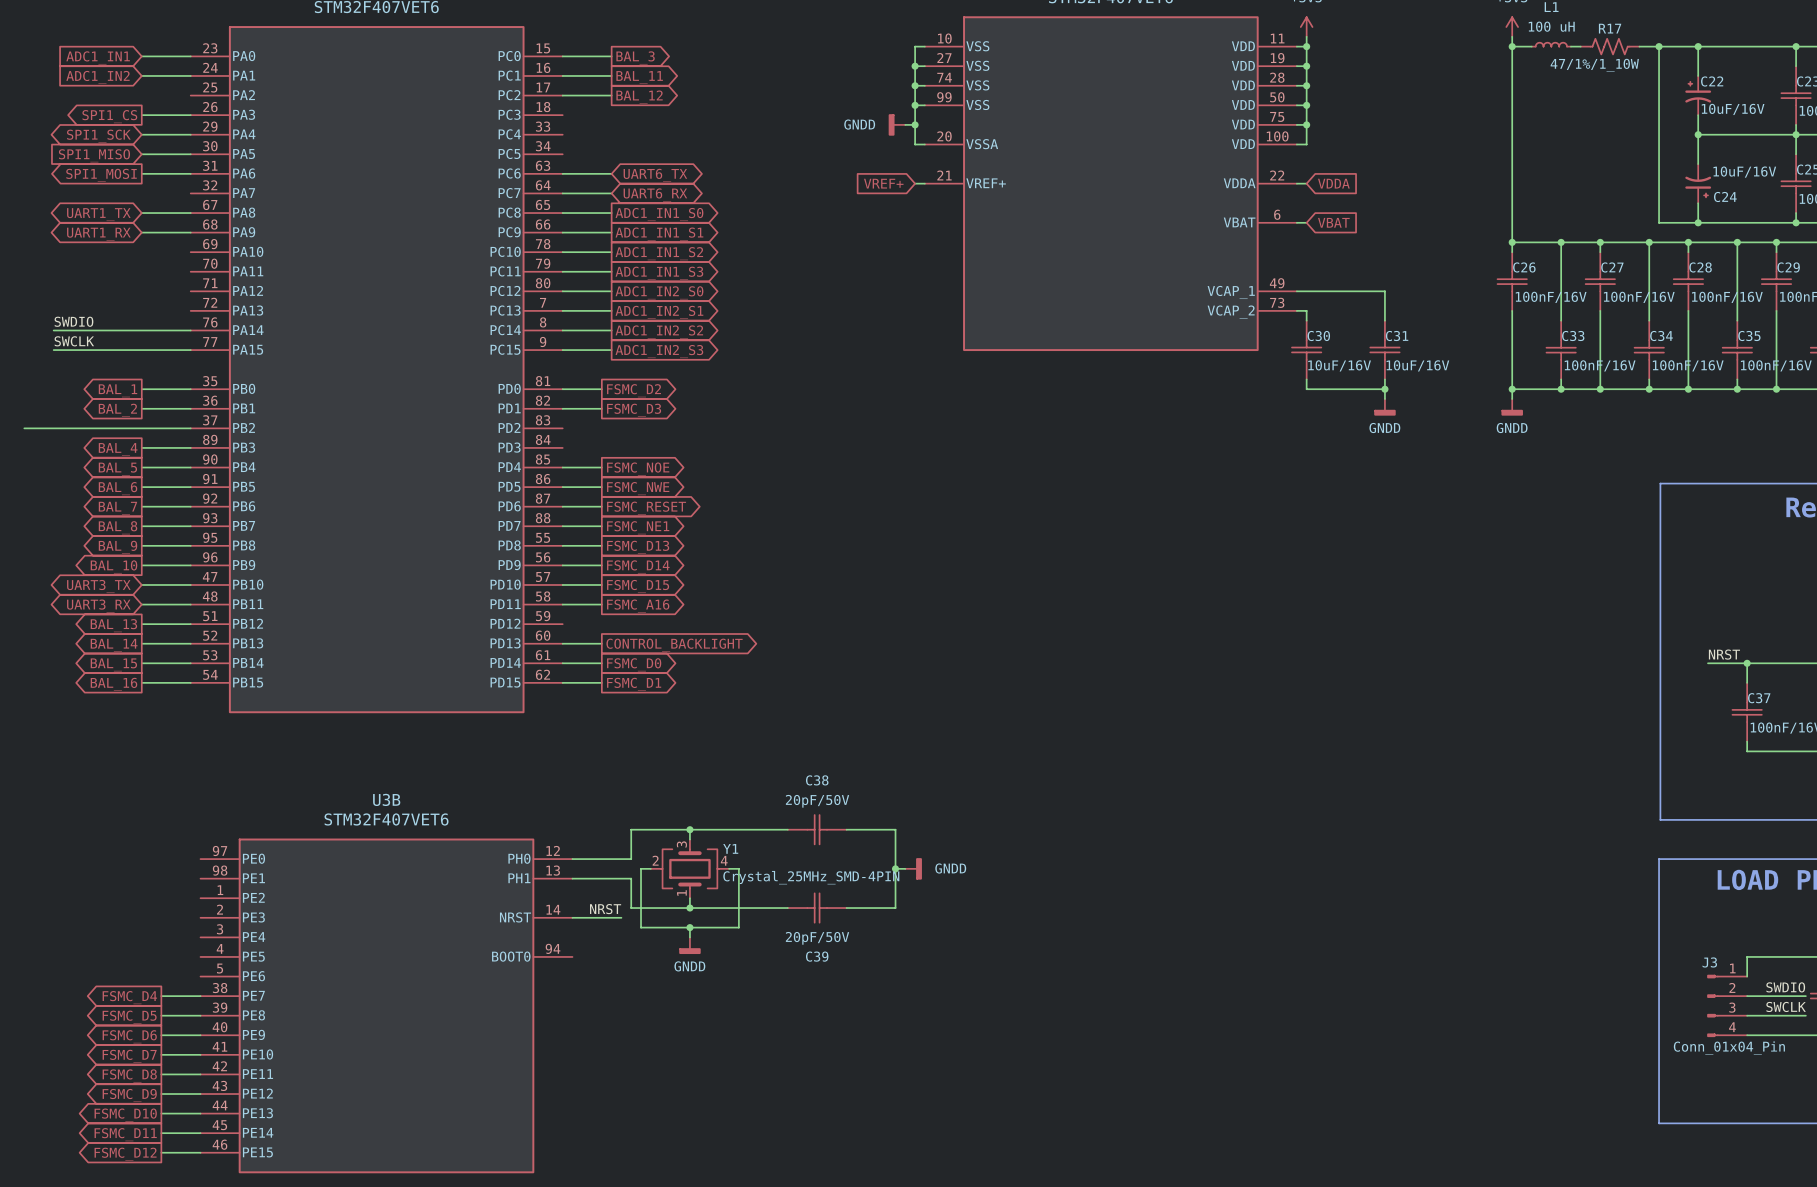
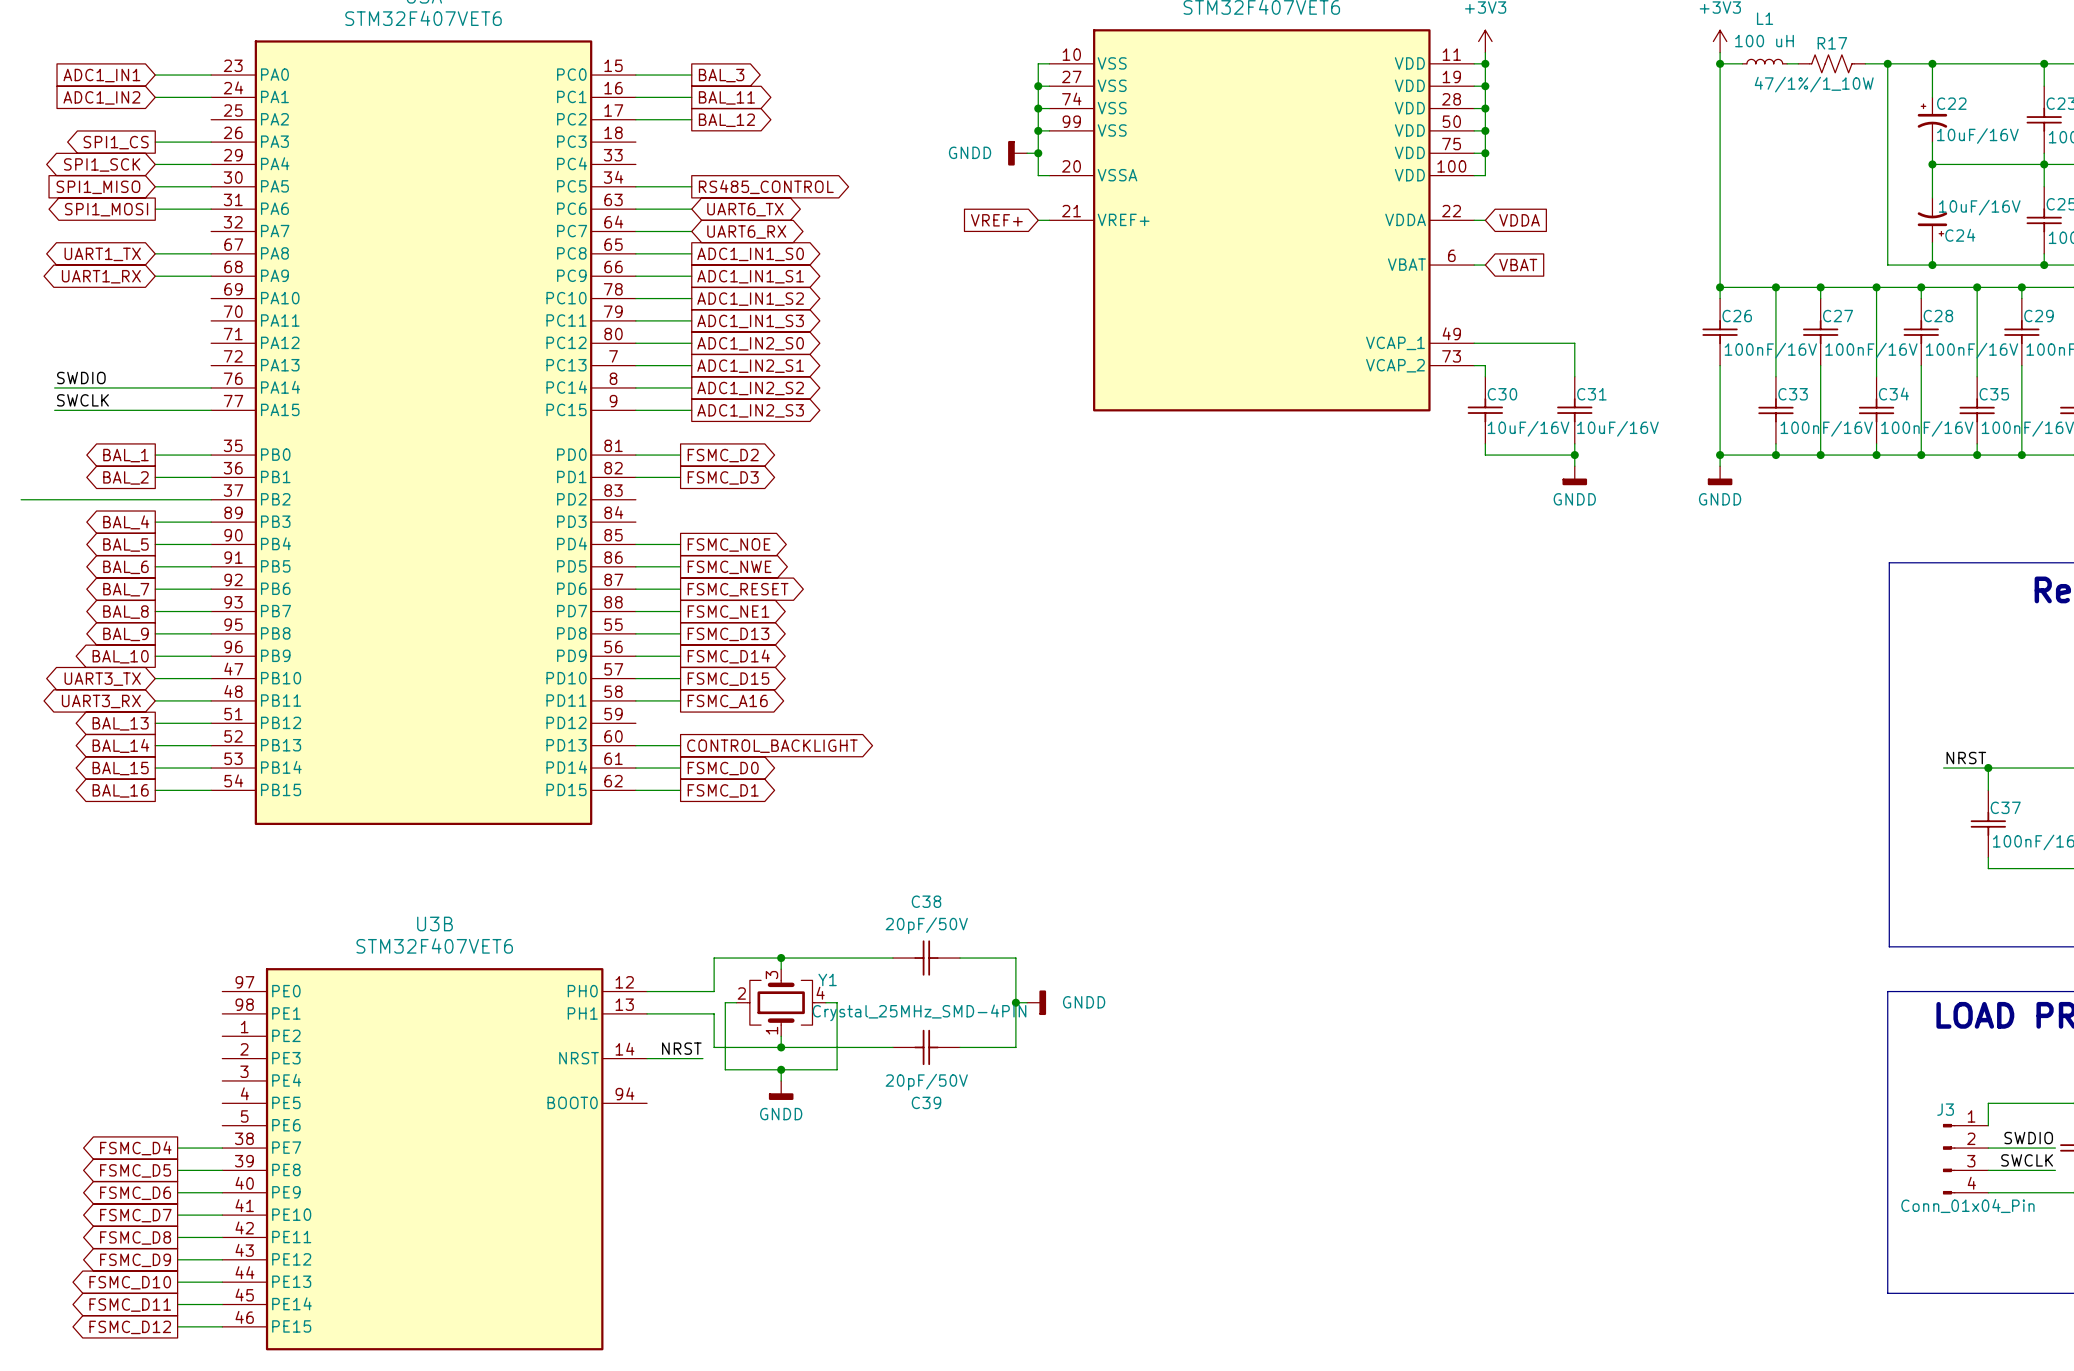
wire: none -> (635, 186) (691, 186)
global label: none -> RS485_CONTROL (766, 187)

